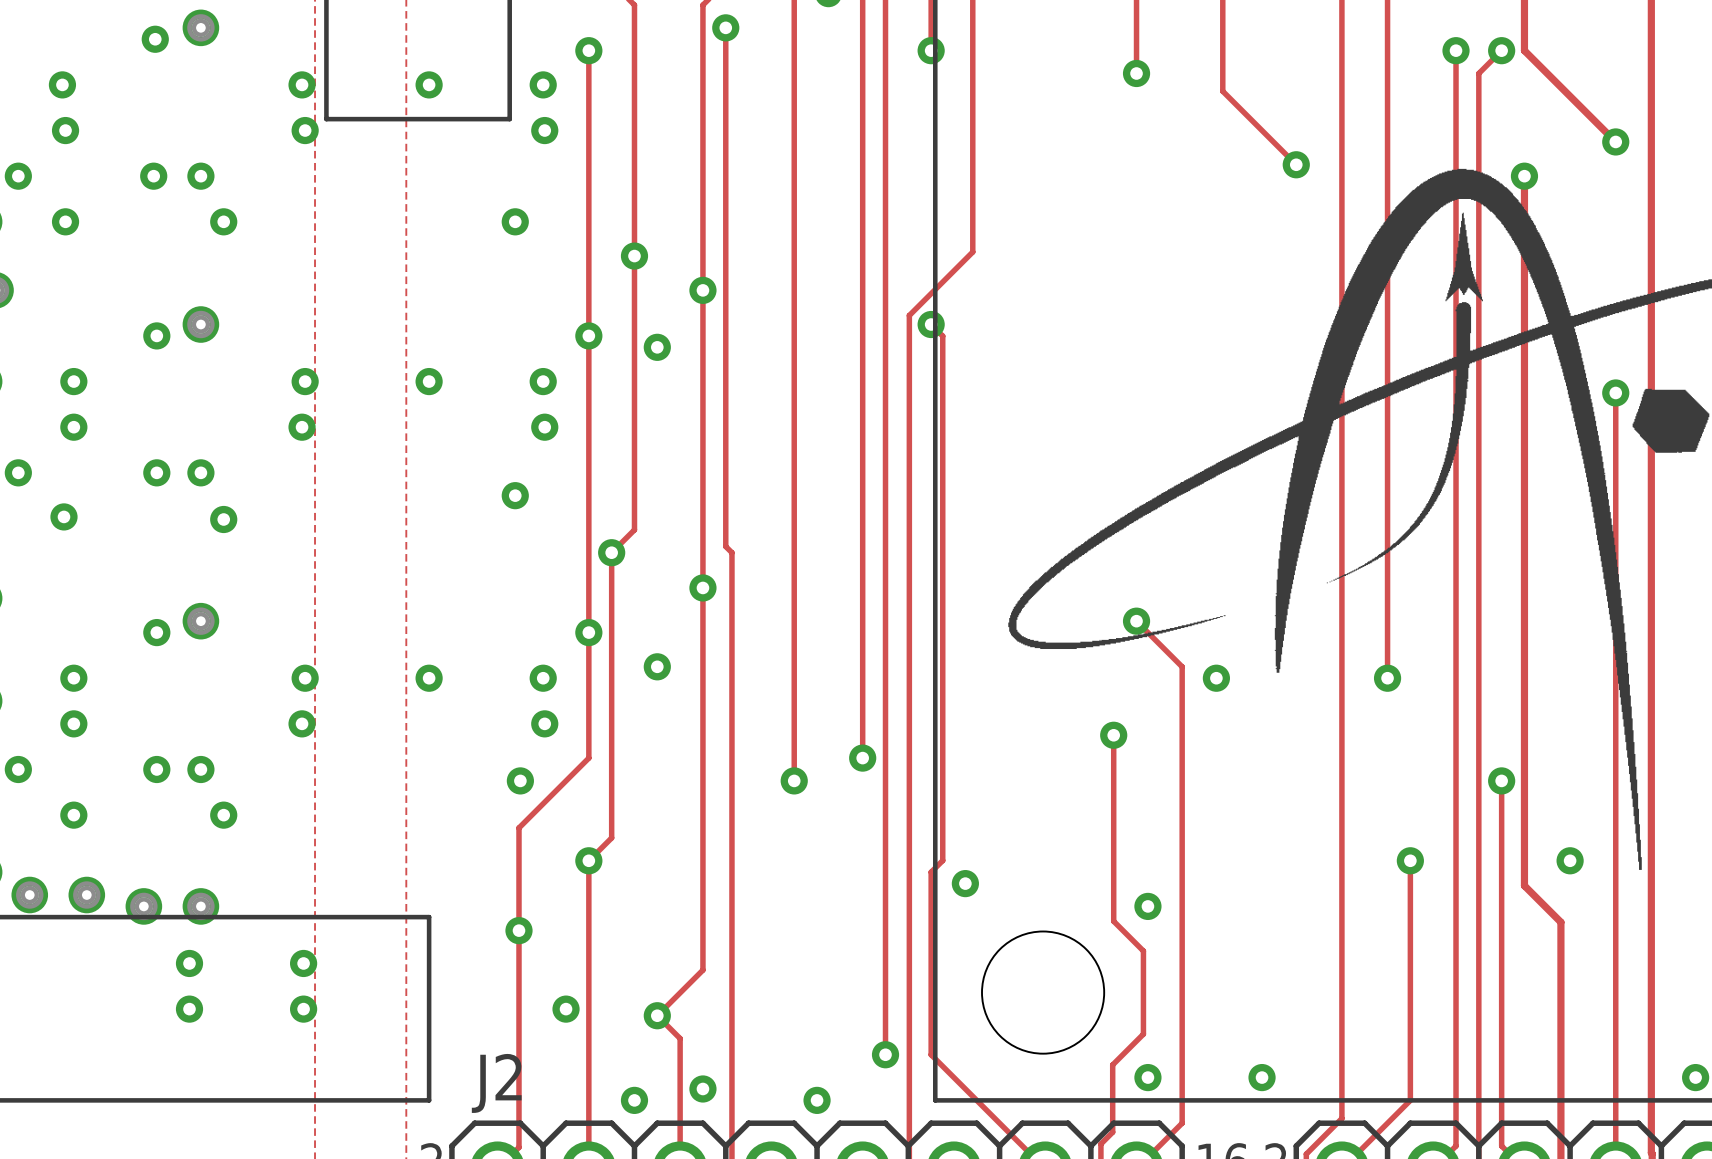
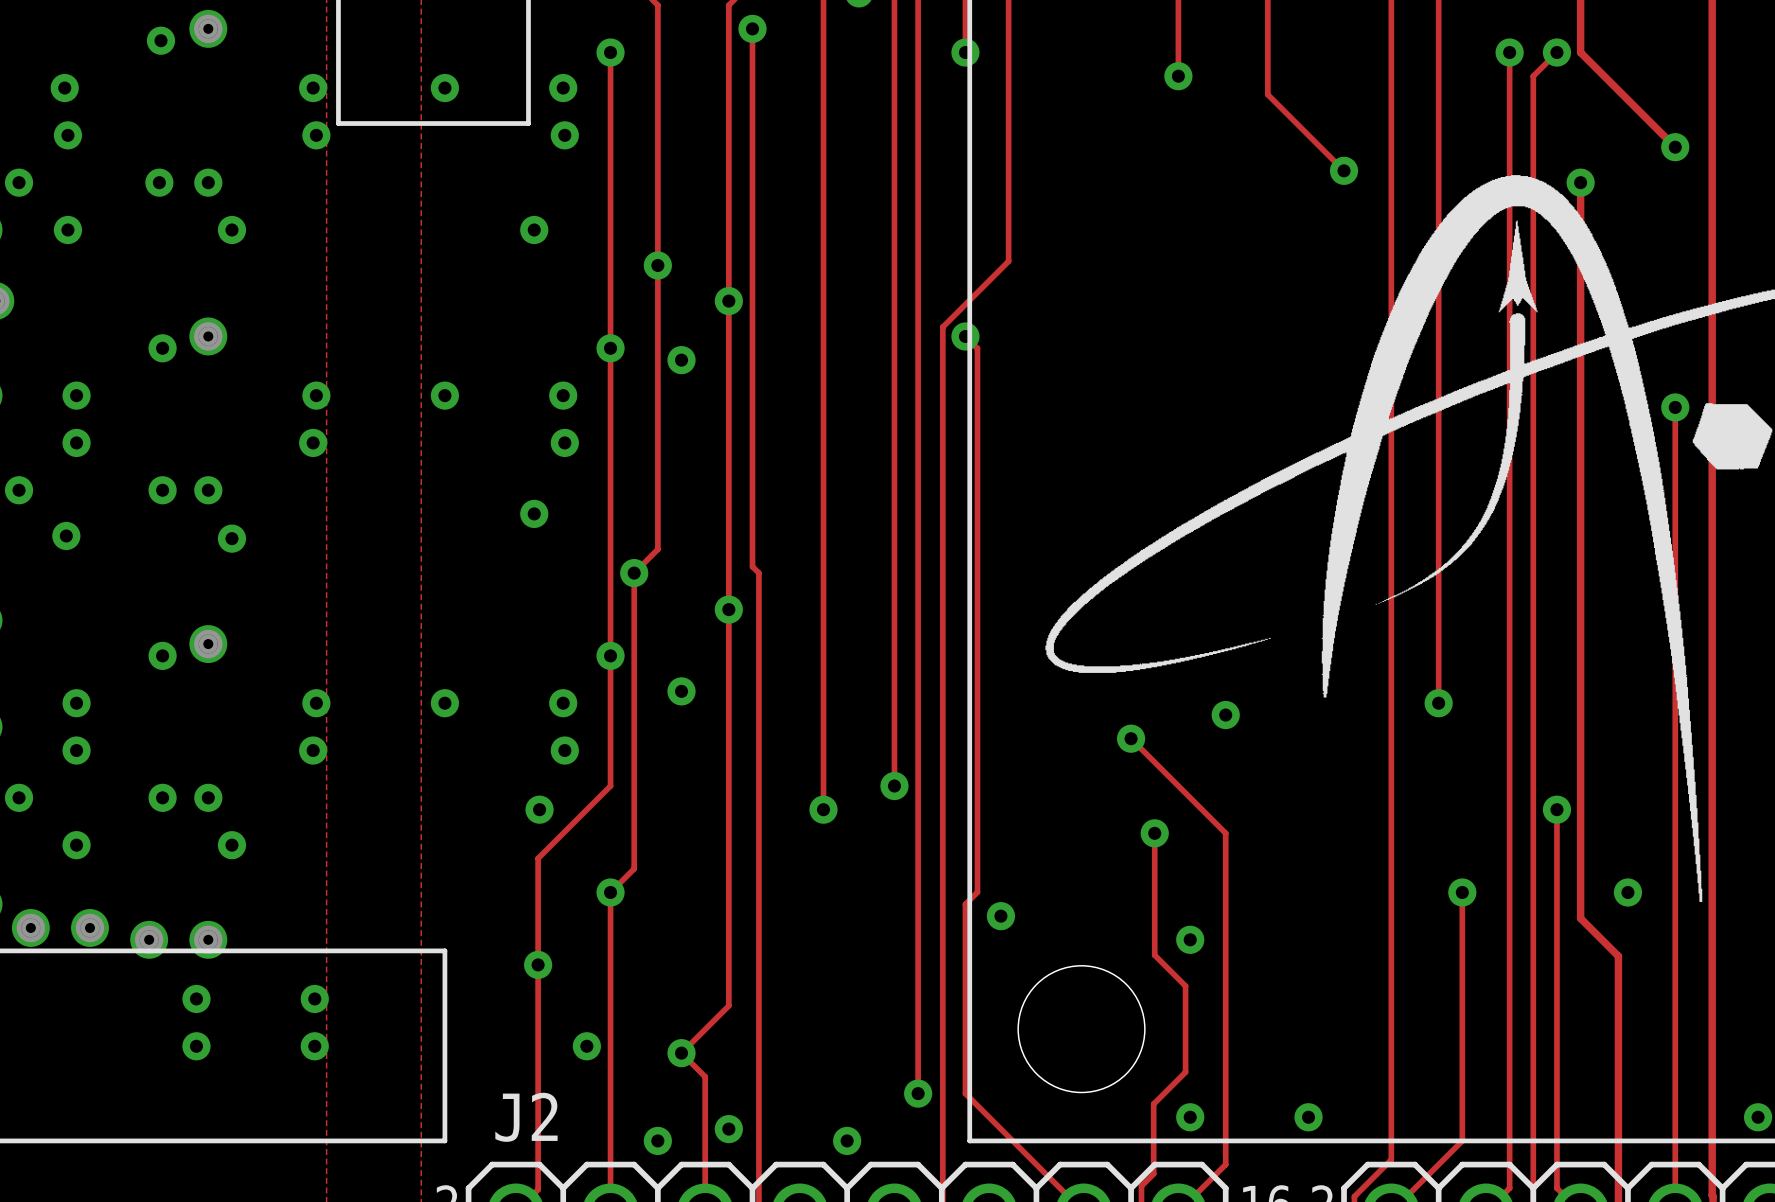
track: (1136, 621) (1182, 666) (1182, 803) -> (1131, 738) (1225, 833)
via: (1136, 621) -> none
via position: (1216, 678) -> (1225, 715)
track: (1113, 735) (1113, 803) -> none
via position: (1113, 735) -> (1131, 738)
via: none -> (1154, 833)

